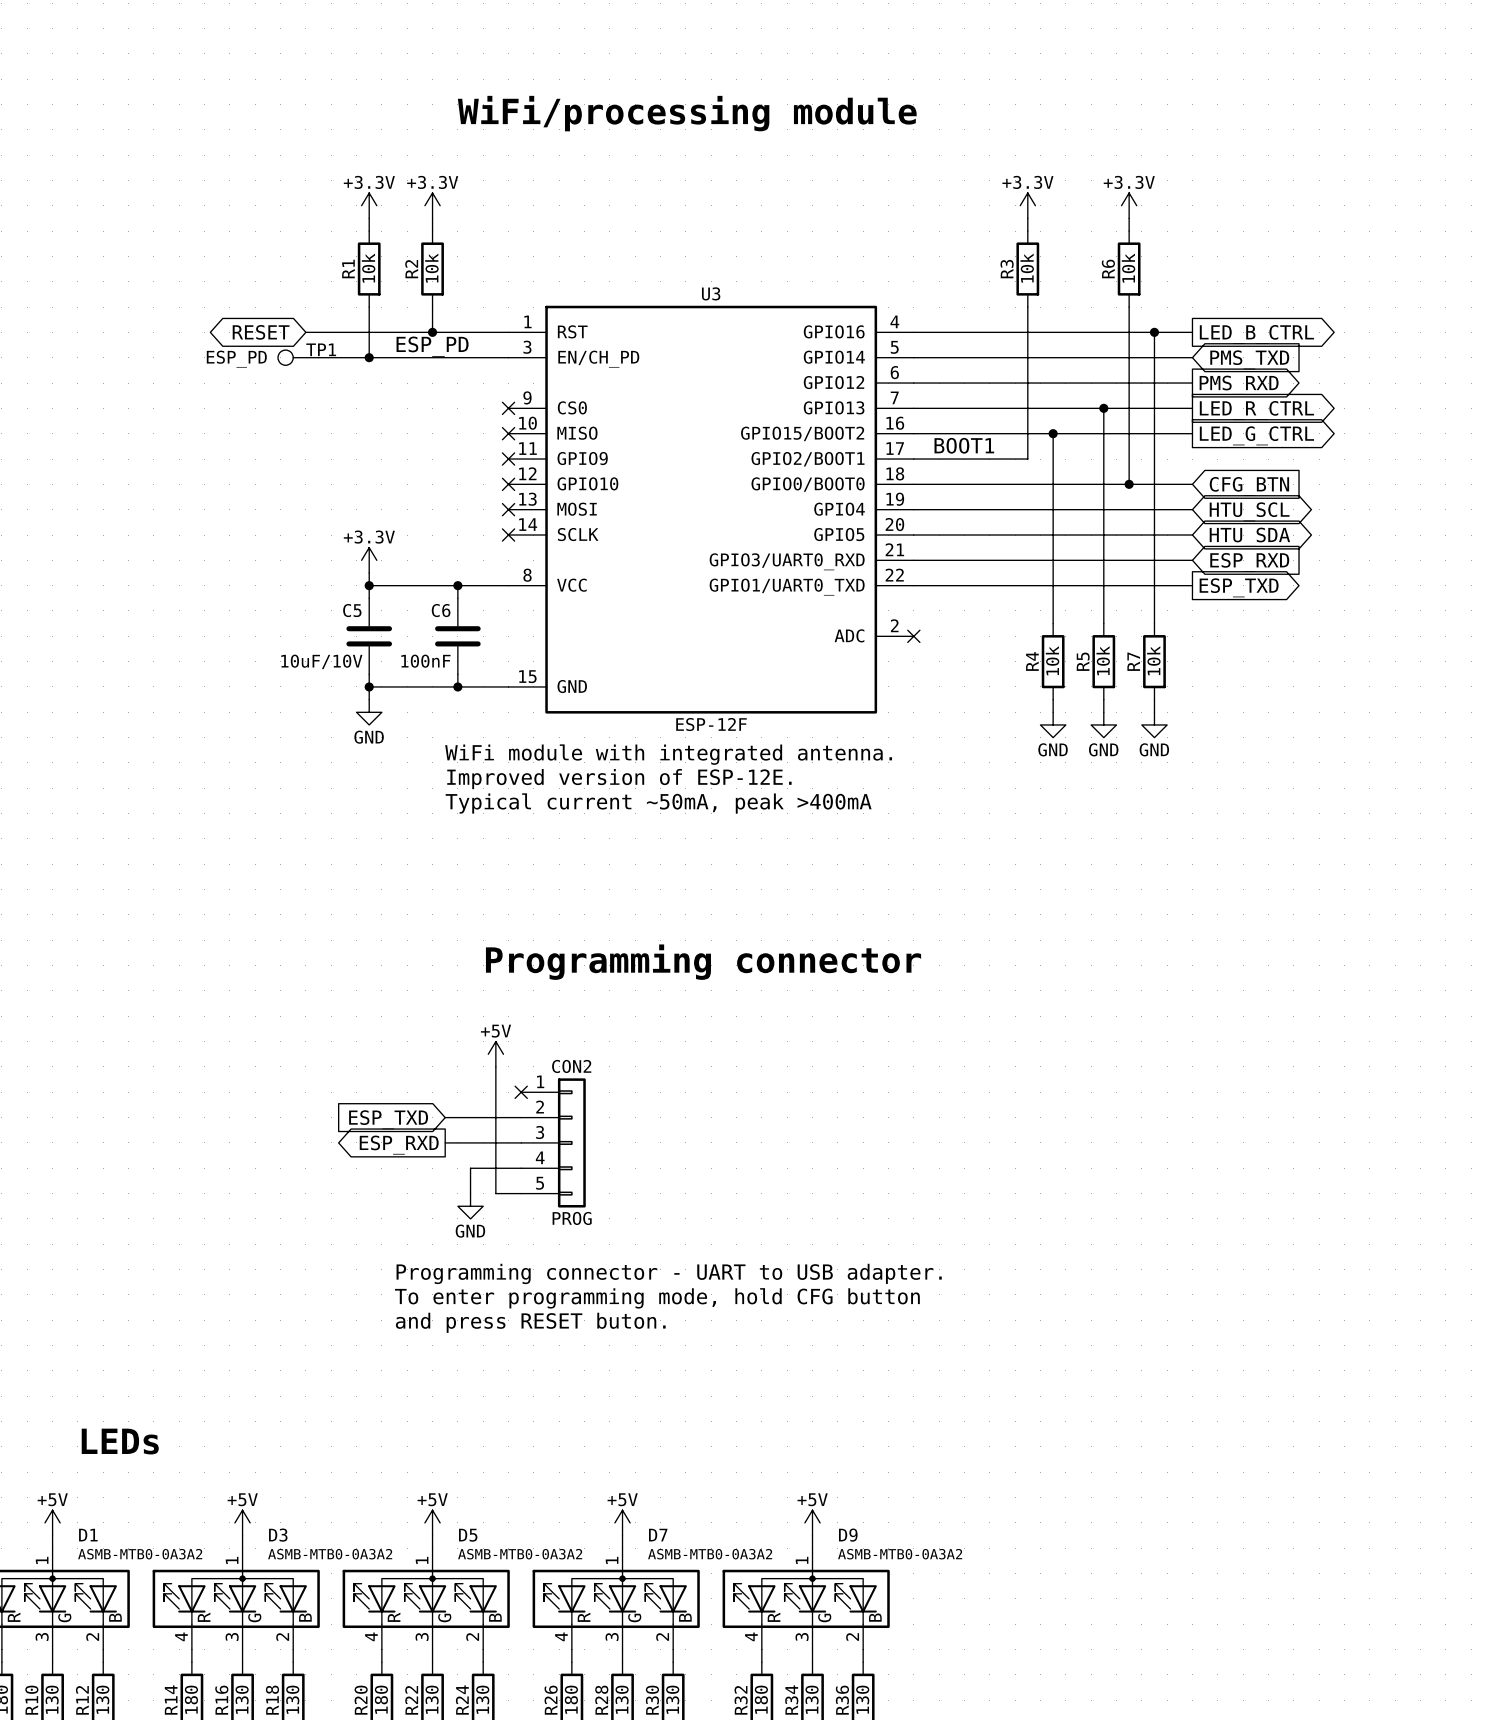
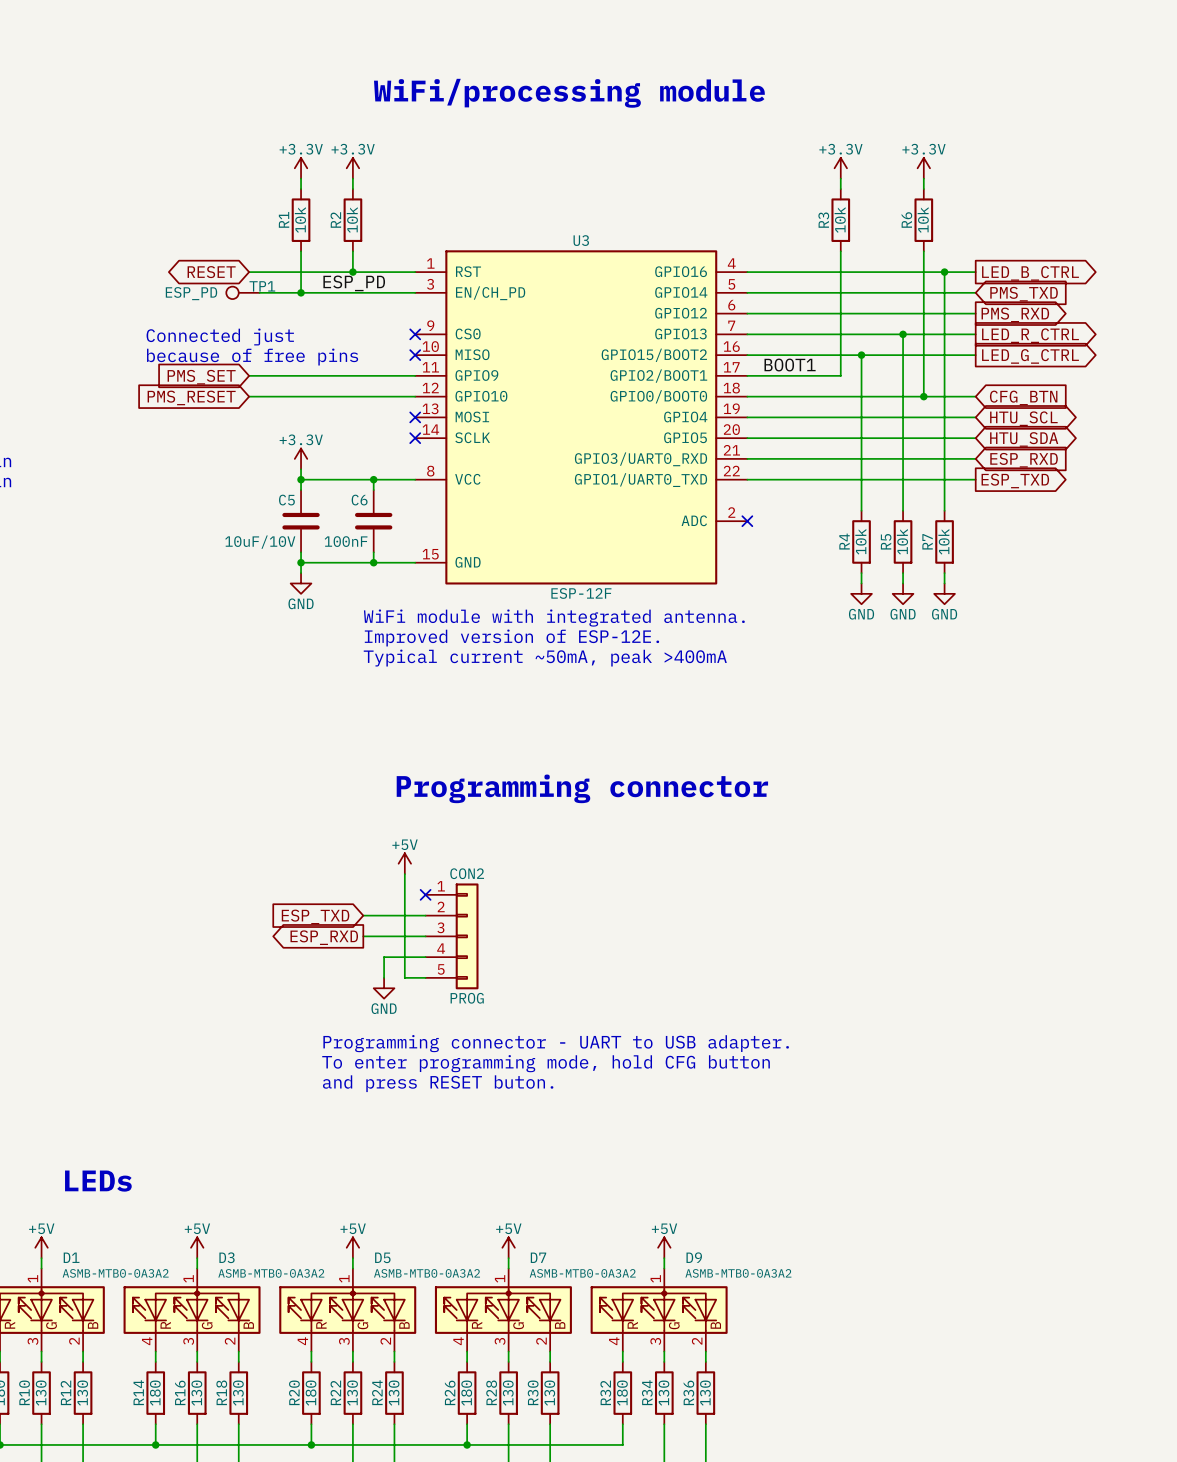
text: none -> Connected just (220, 336)
text: none -> because of free pins (252, 357)
wire: none -> (249, 375) (415, 375)
no-connect mark: (508, 459) -> none
global label: none -> PMS_SET (201, 377)
wire: none -> (249, 396) (415, 396)
no-connect mark: (508, 484) -> none
global label: none -> PMS_RESET (191, 397)

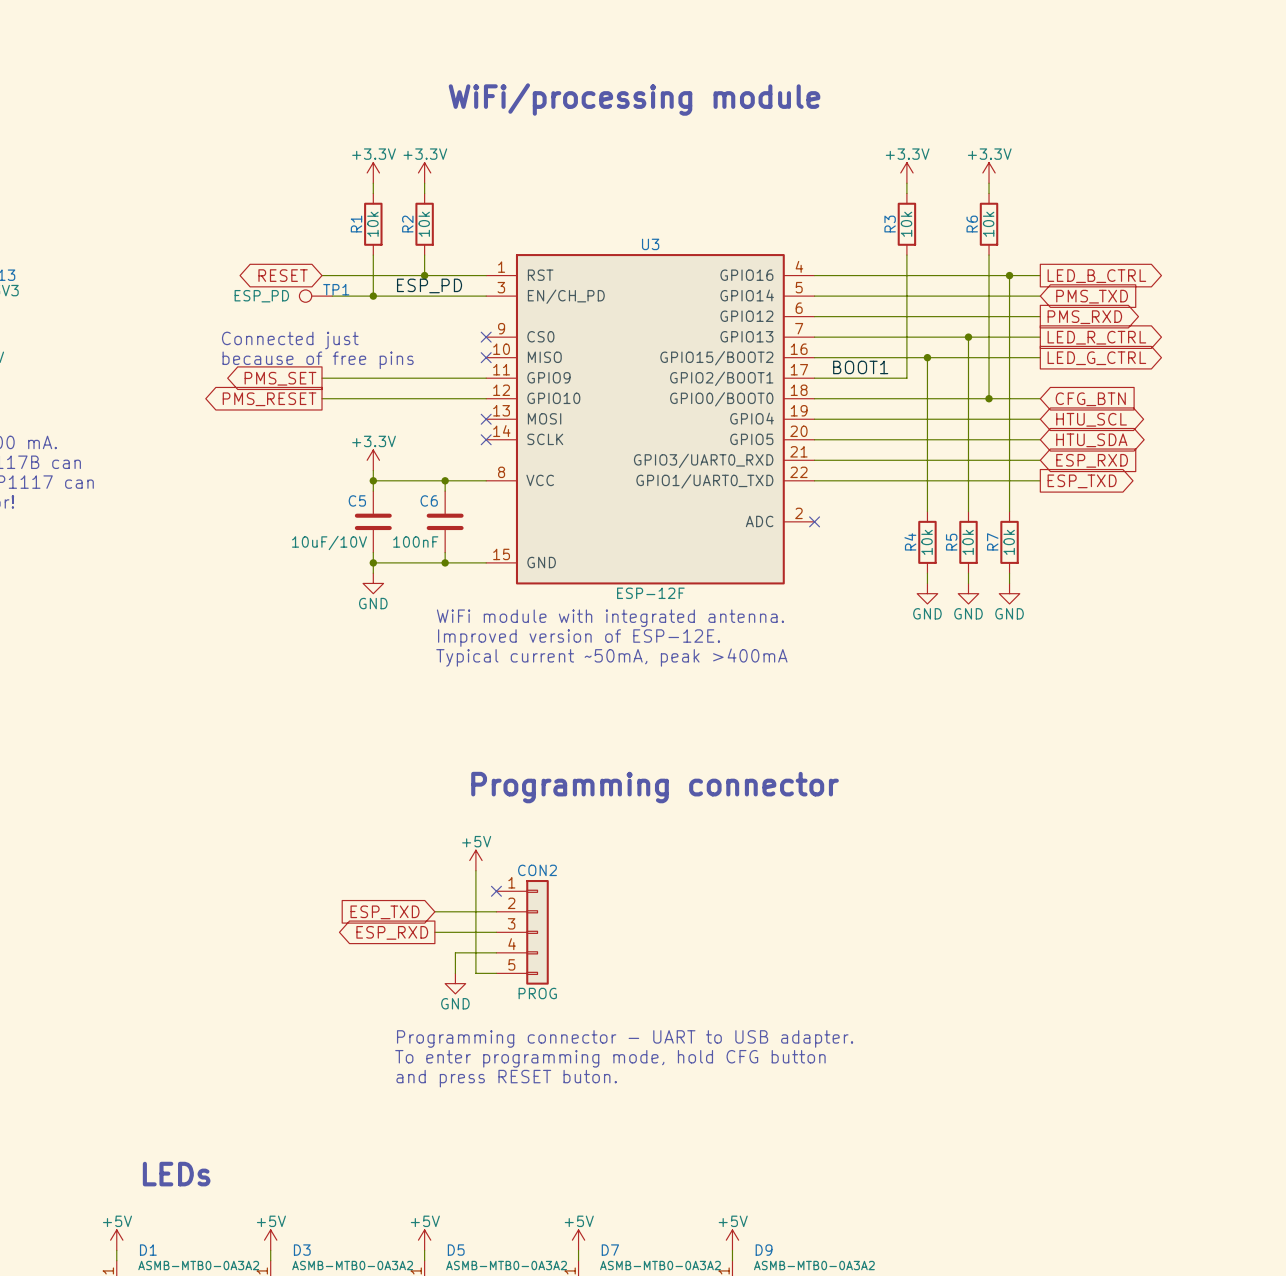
global label shape: input (201, 377) -> output (280, 378)
global label shape: input (191, 397) -> output (269, 399)

